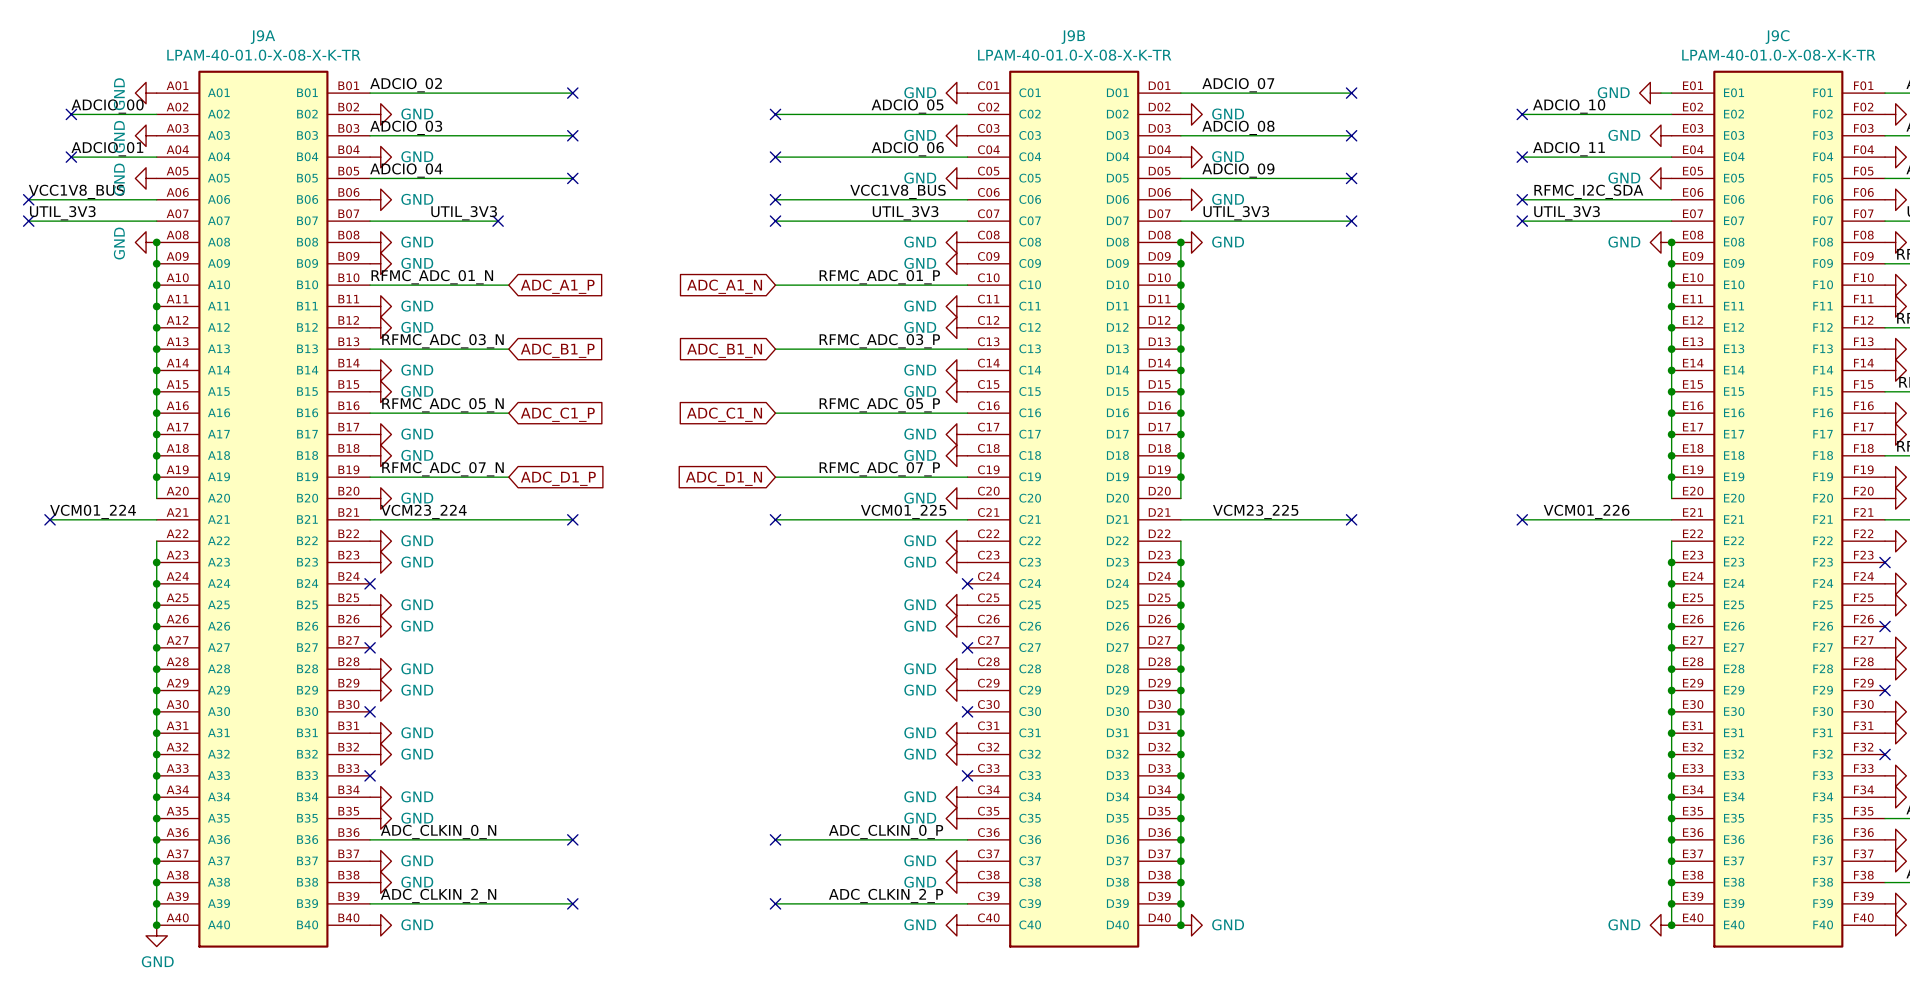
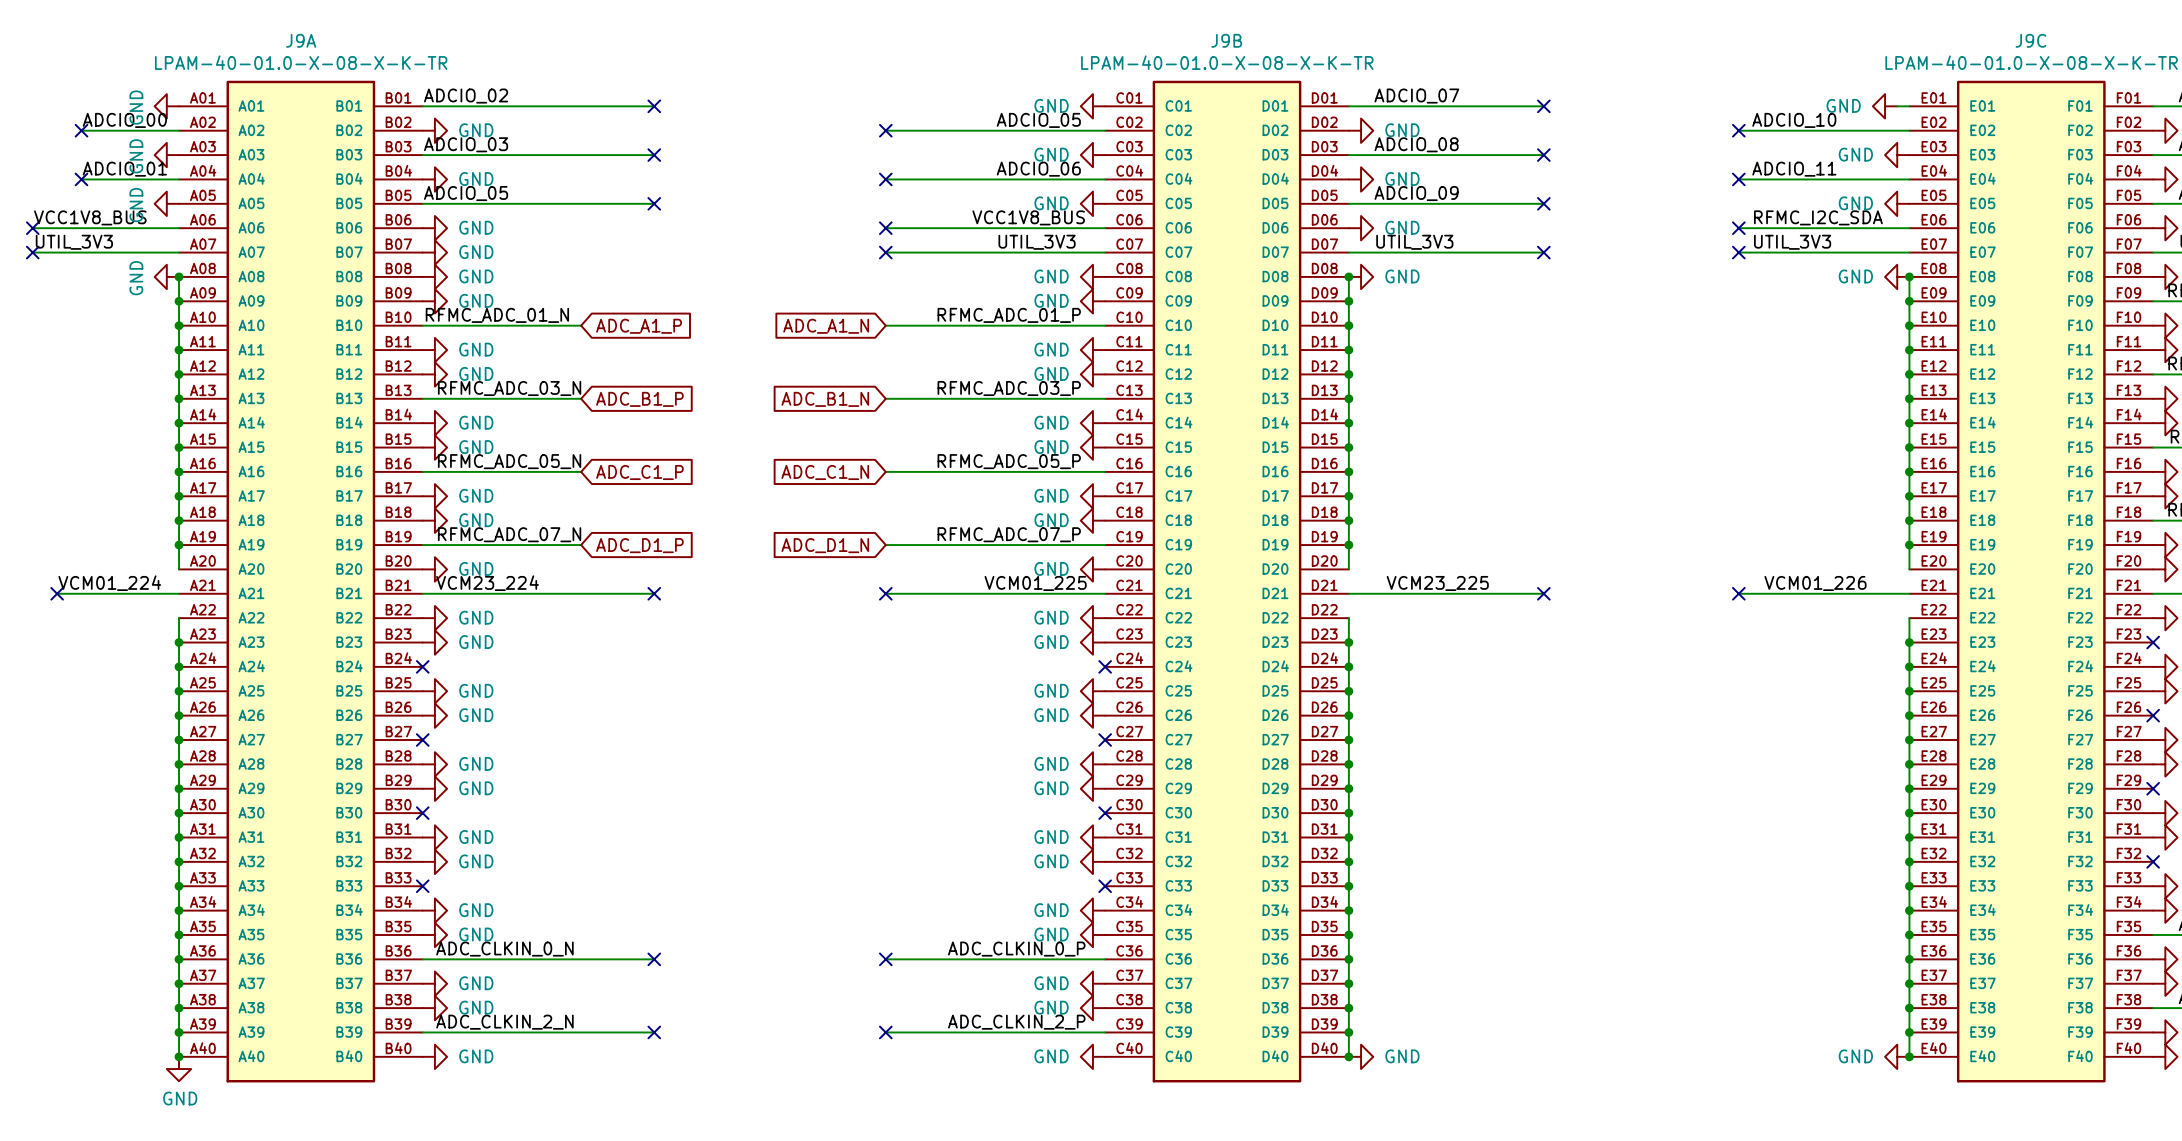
label: ADCIO_04 (406, 170) -> ADCIO_05 (466, 193)
label: UTIL_3V3 (464, 213) -> none
wire: (370, 221) (498, 221) -> none
power symbol: none -> GND (434, 252)
no-connect mark: (498, 221) -> none

